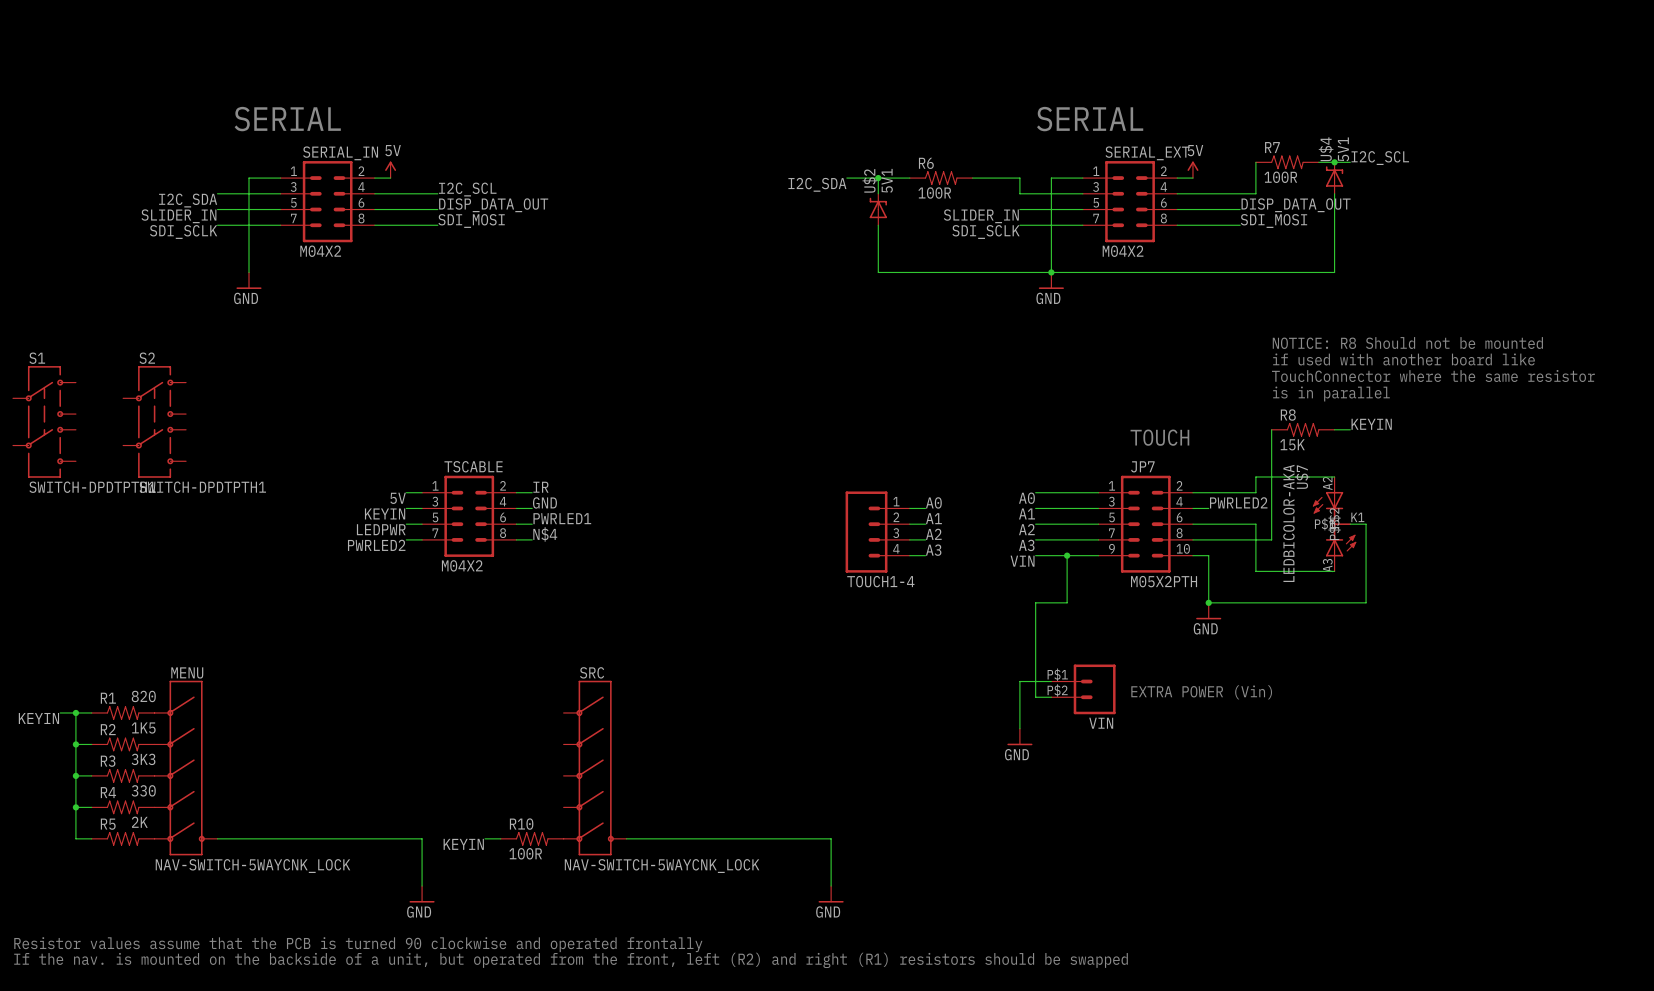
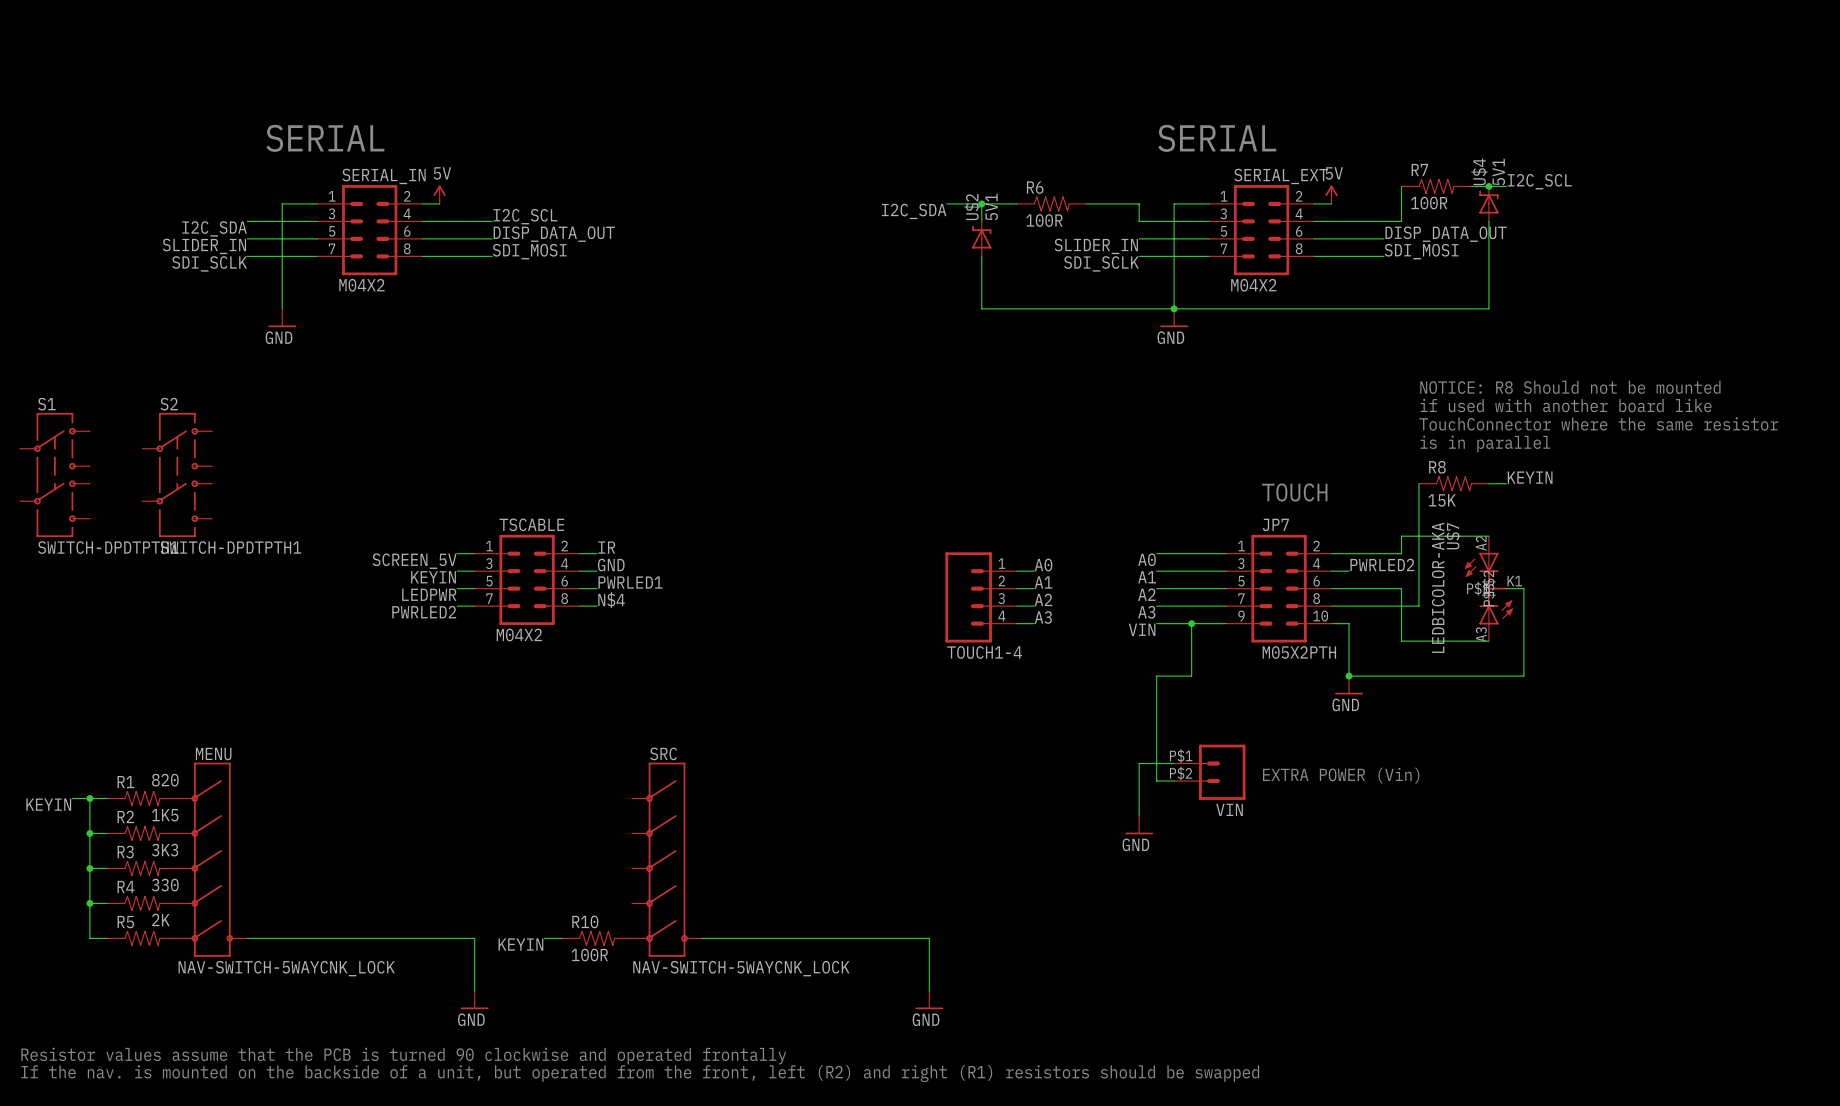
label: 5V (398, 498) -> SCREEN_5V (414, 561)

